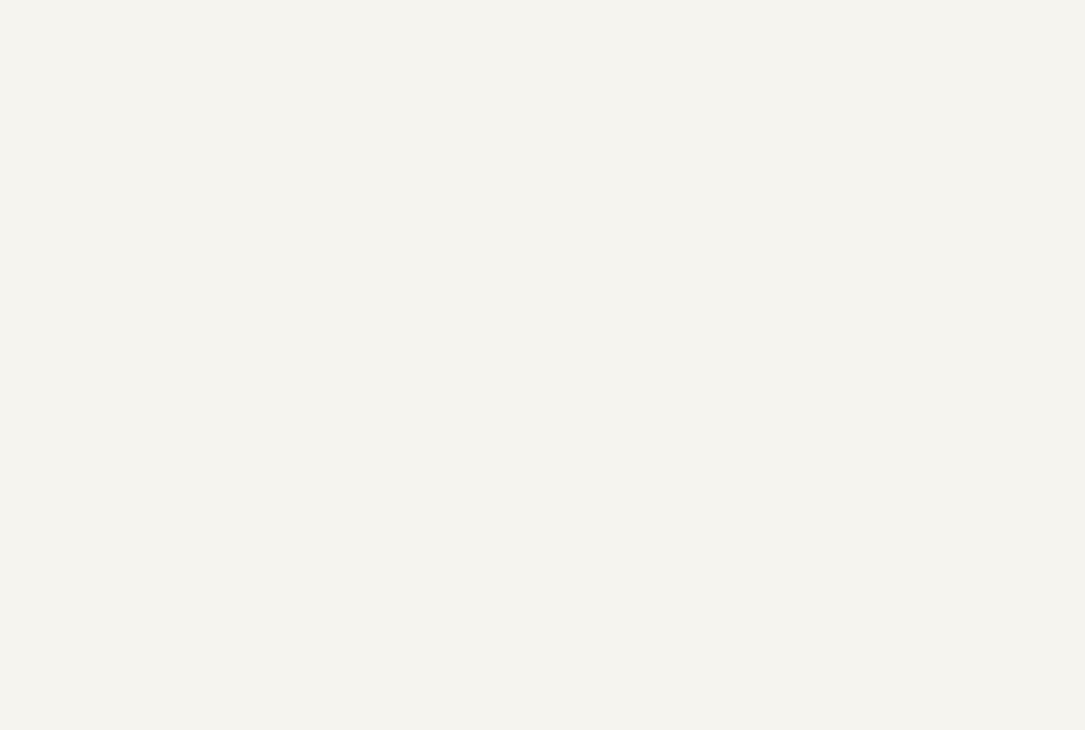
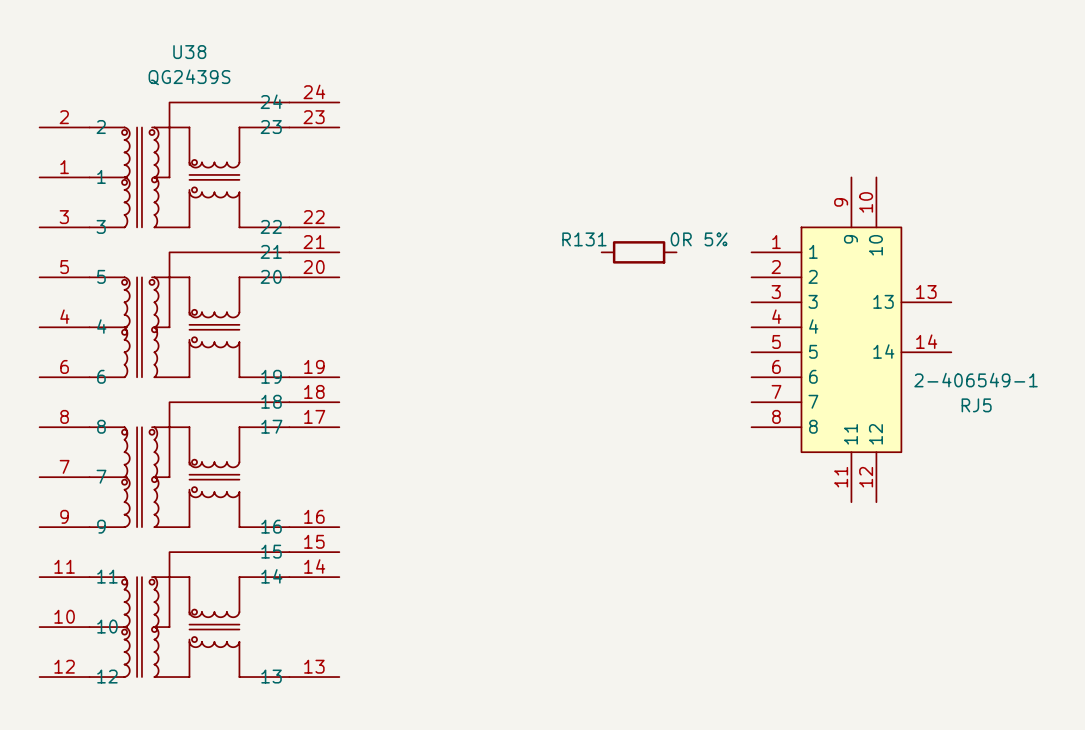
R131: none -> 0R 5% (639, 252)
RJ5: none -> 2-406549-1 (851, 339)
U38: none -> QG2439S (189, 389)

